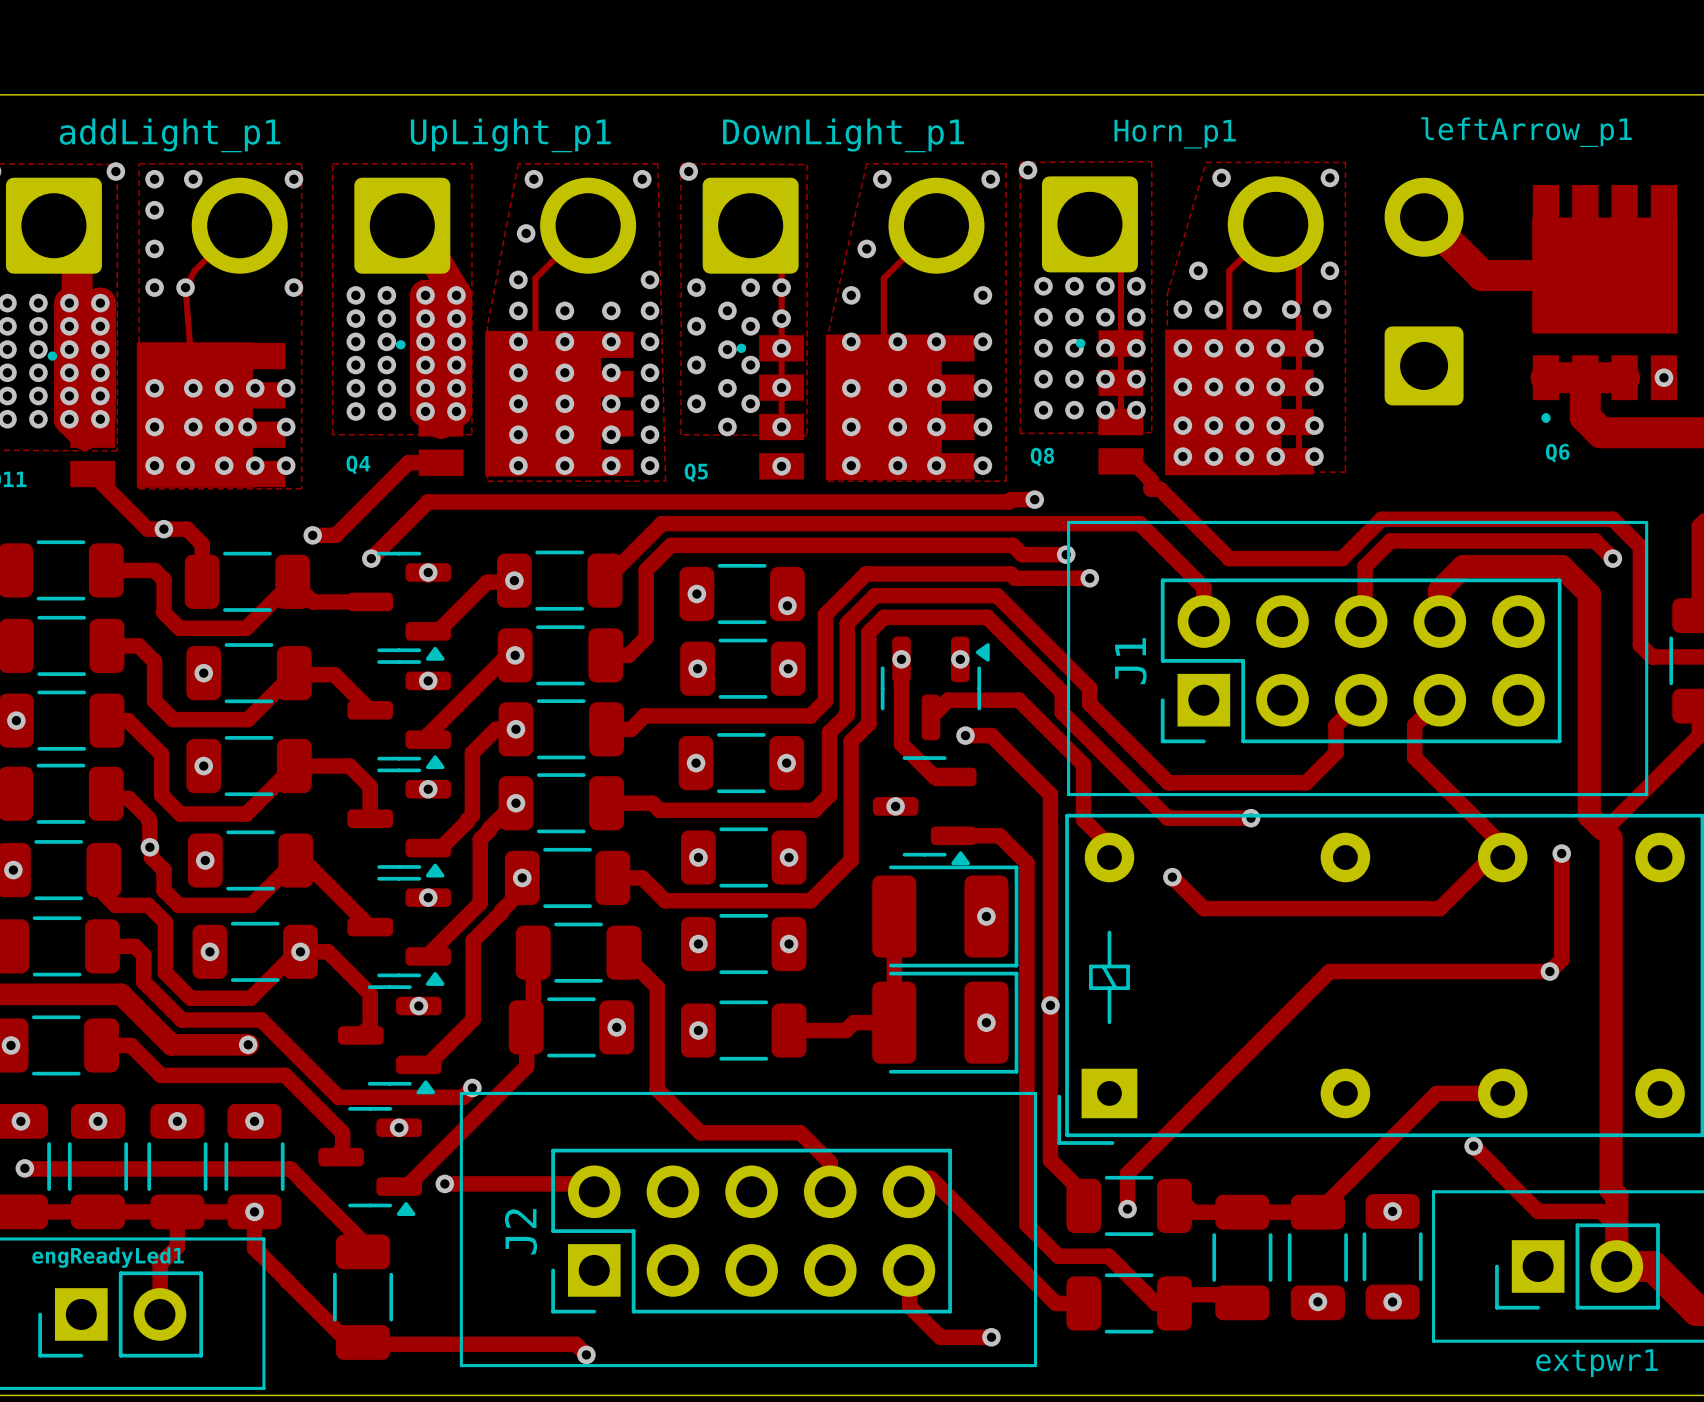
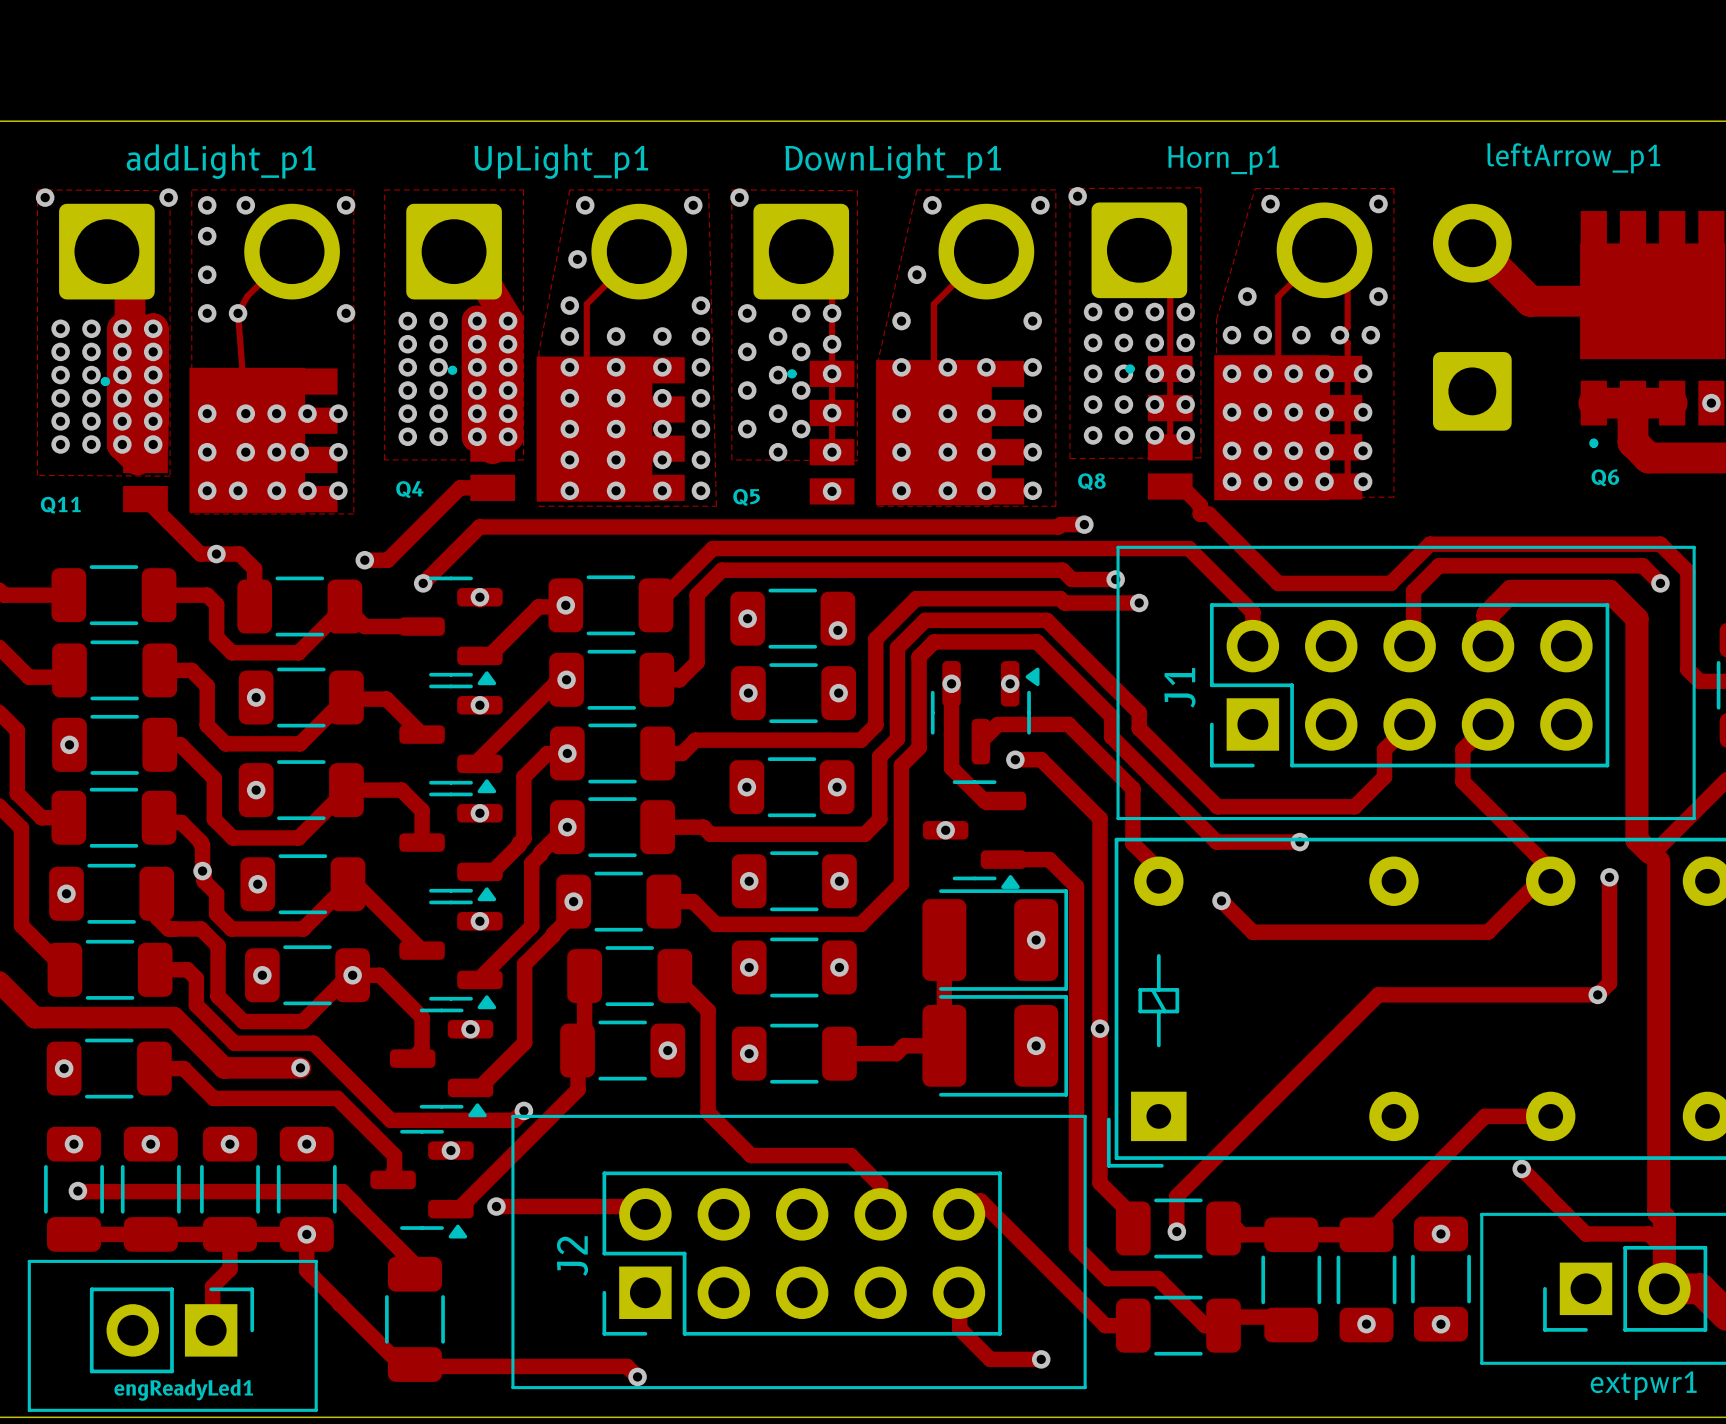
engReadyLed1 rotation: 0° (120, 1314) -> 180° (171, 1330)

